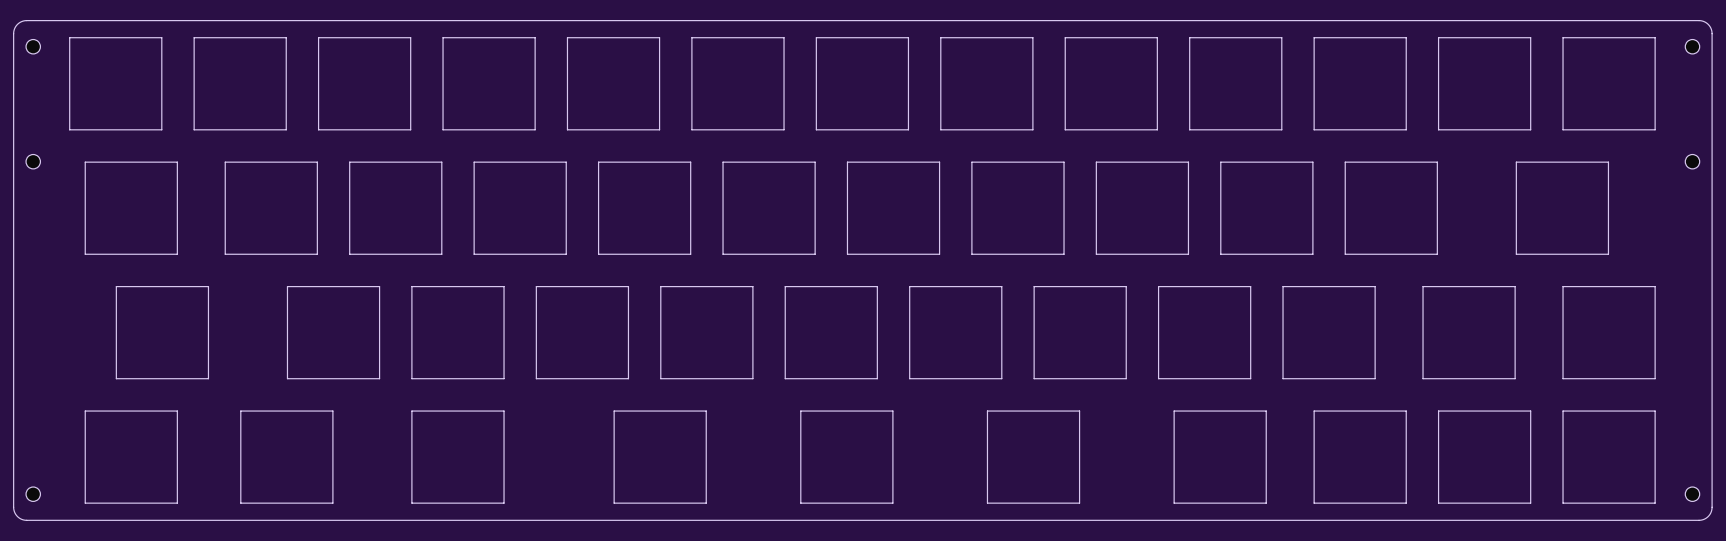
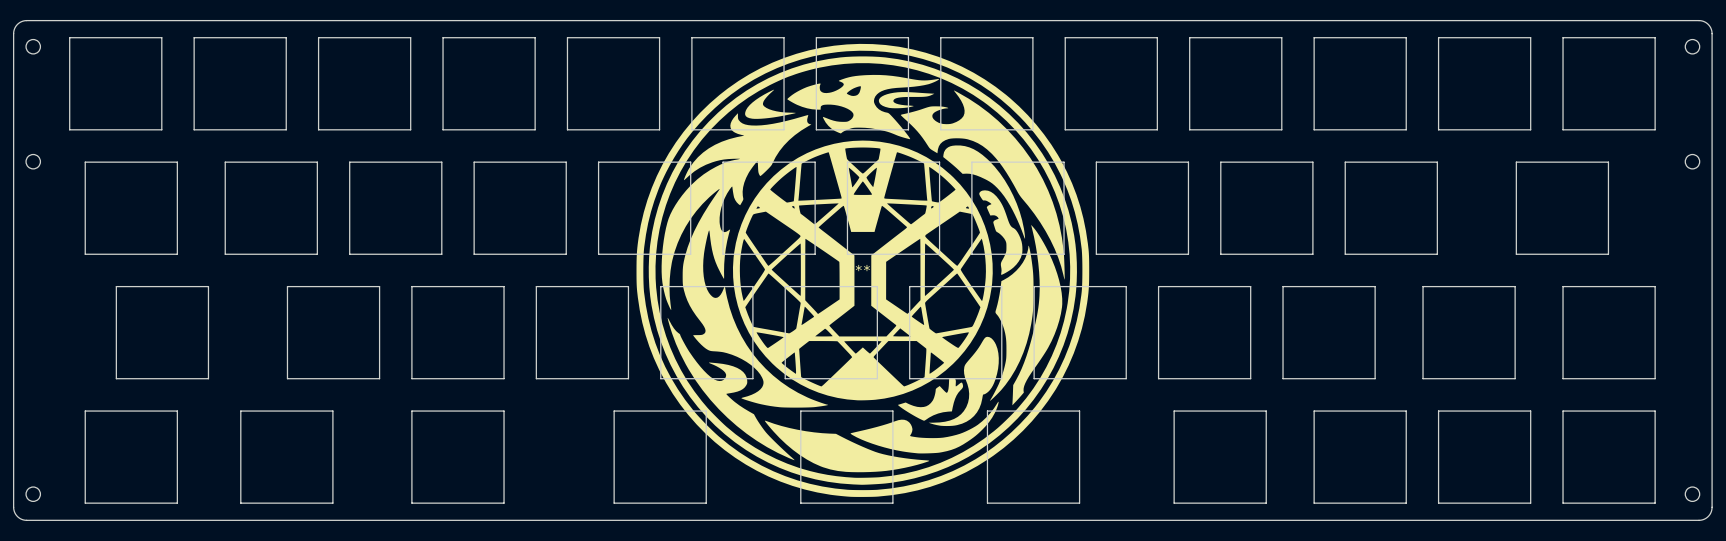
part: none -> (862, 270)

